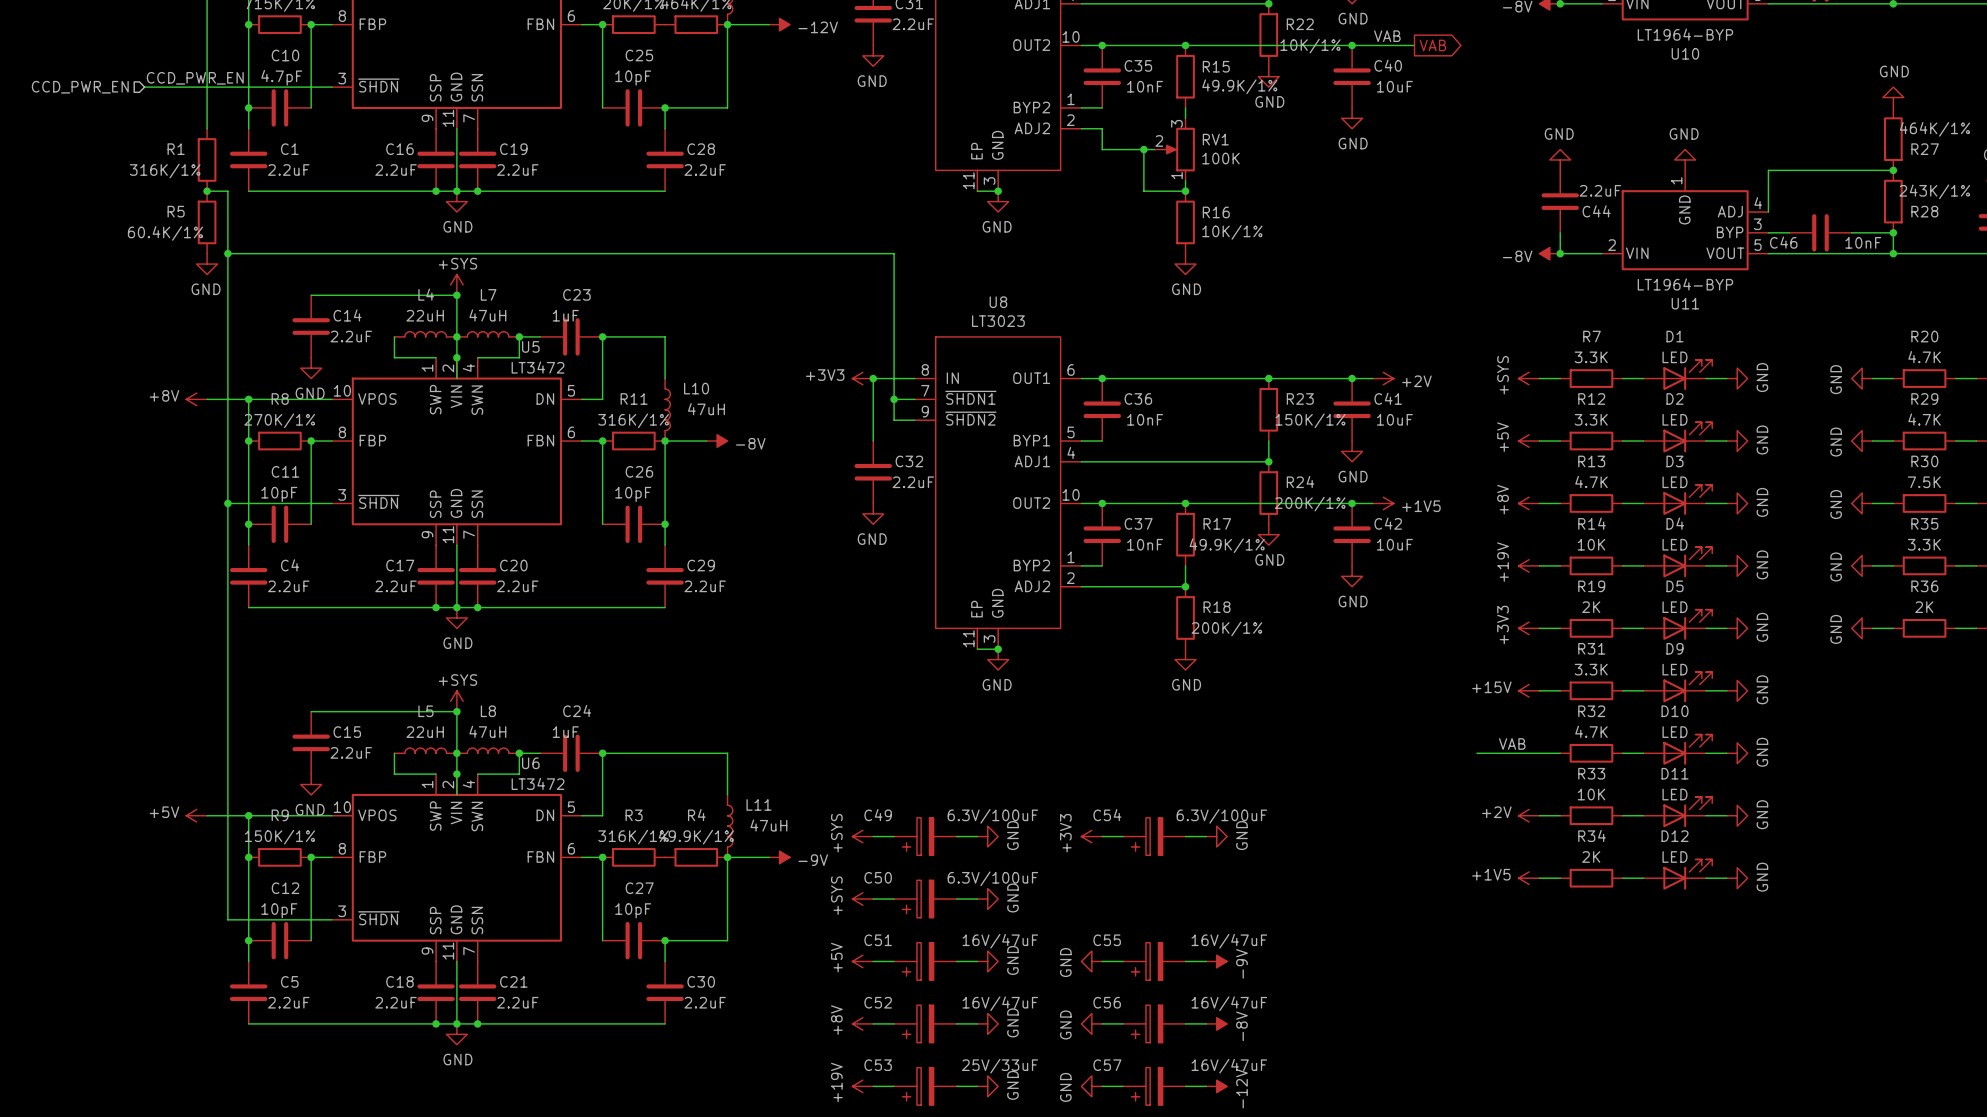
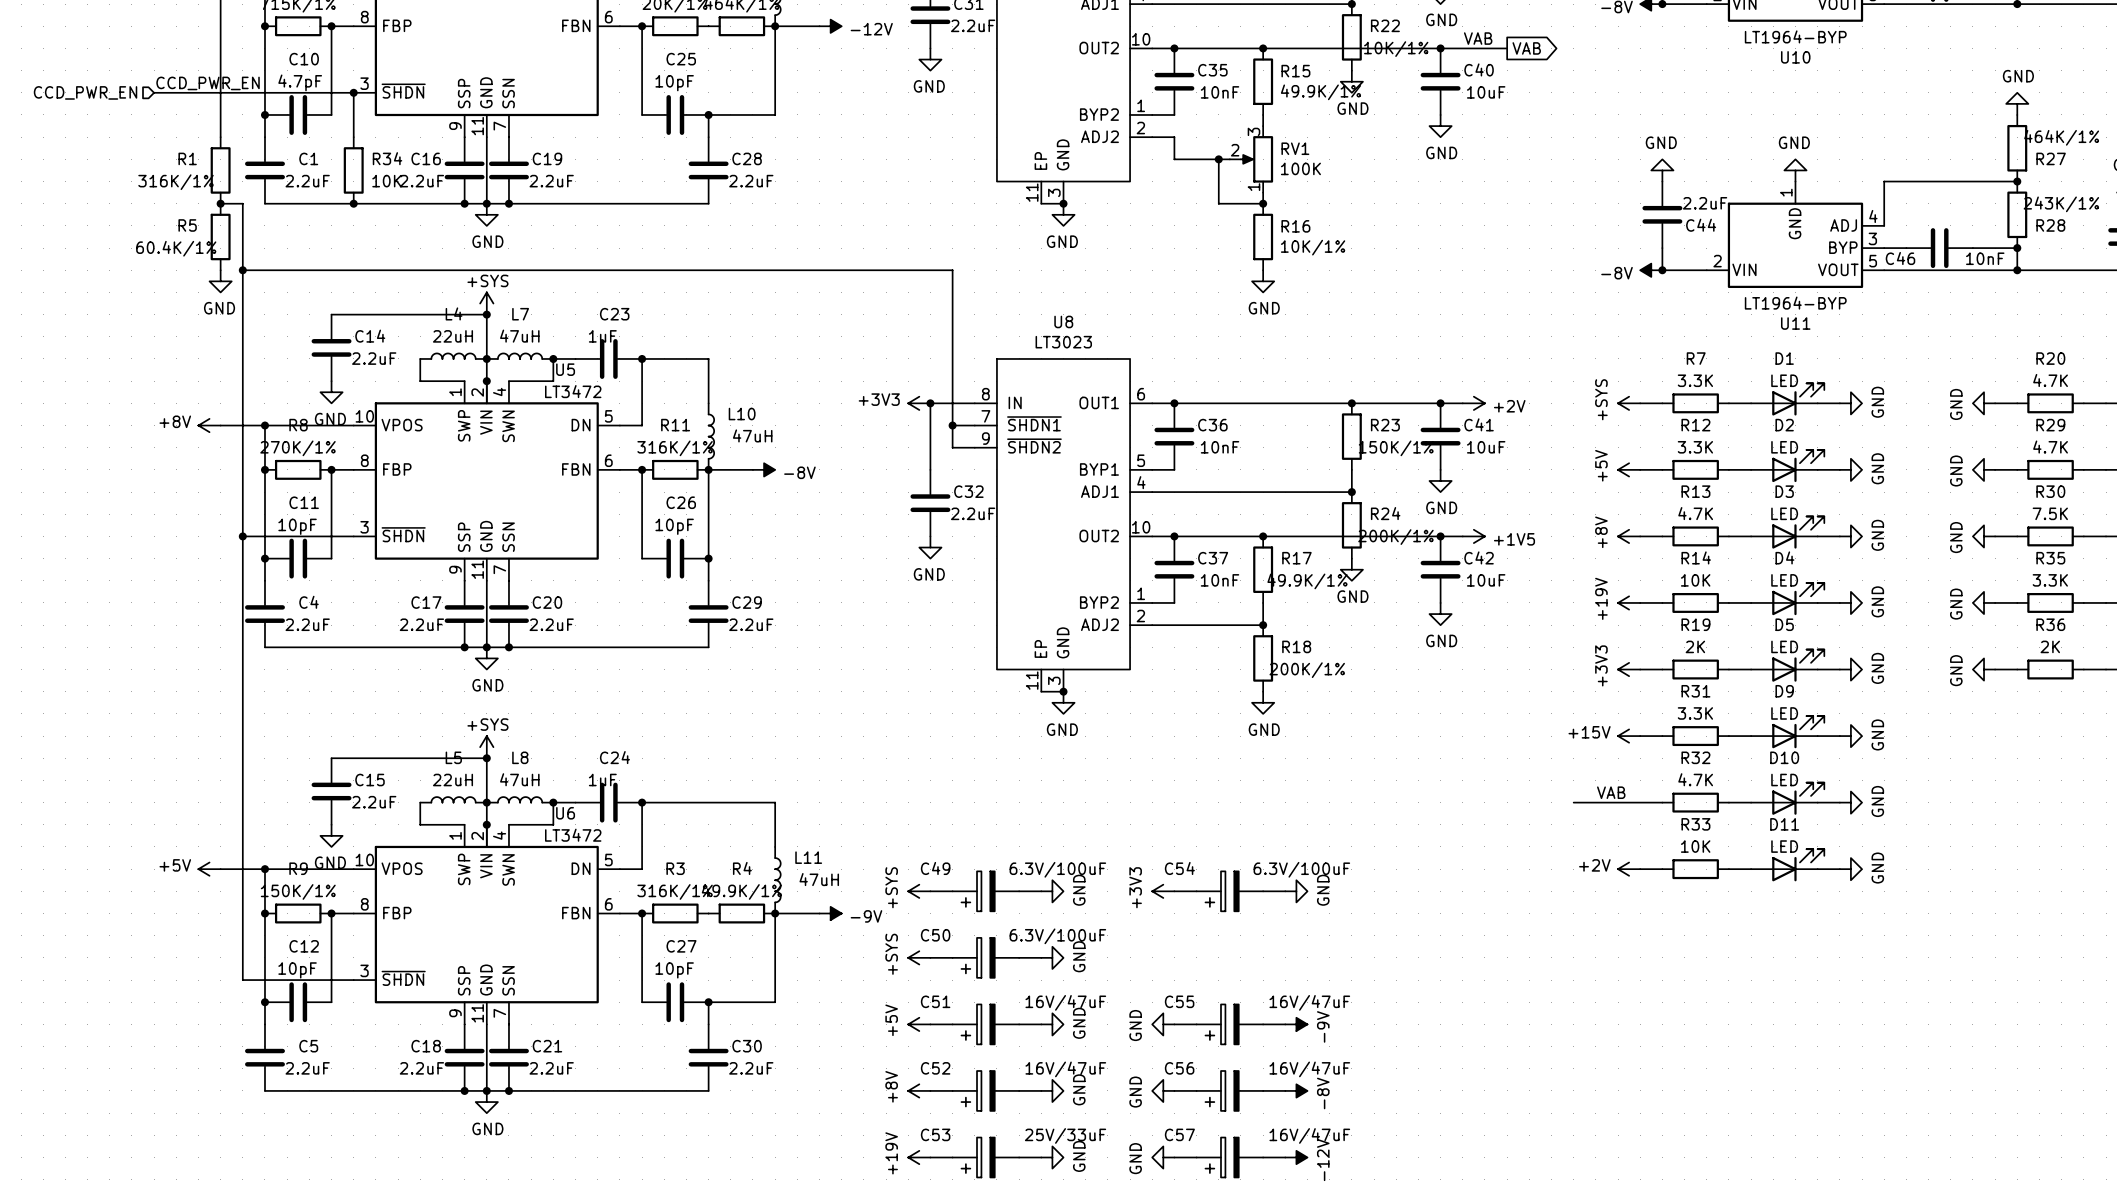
wire: none -> (353, 92) (353, 137)
junction: none -> (353, 92)
junction: none -> (353, 203)
R34 value: 2K (1591, 856) -> 10K (386, 181)
D12: LED (1677, 874) -> none
power symbol: +1V5 (1529, 878) -> none
wire: (1539, 878) (1560, 878) -> none
R34 rotation: 0° (1591, 878) -> 90° clockwise (353, 170)
R34 position: (1591, 878) -> (353, 170)
wire: (1622, 878) (1643, 878) -> none
wire: (1705, 878) (1726, 878) -> none
power symbol: GND (1737, 878) -> none

